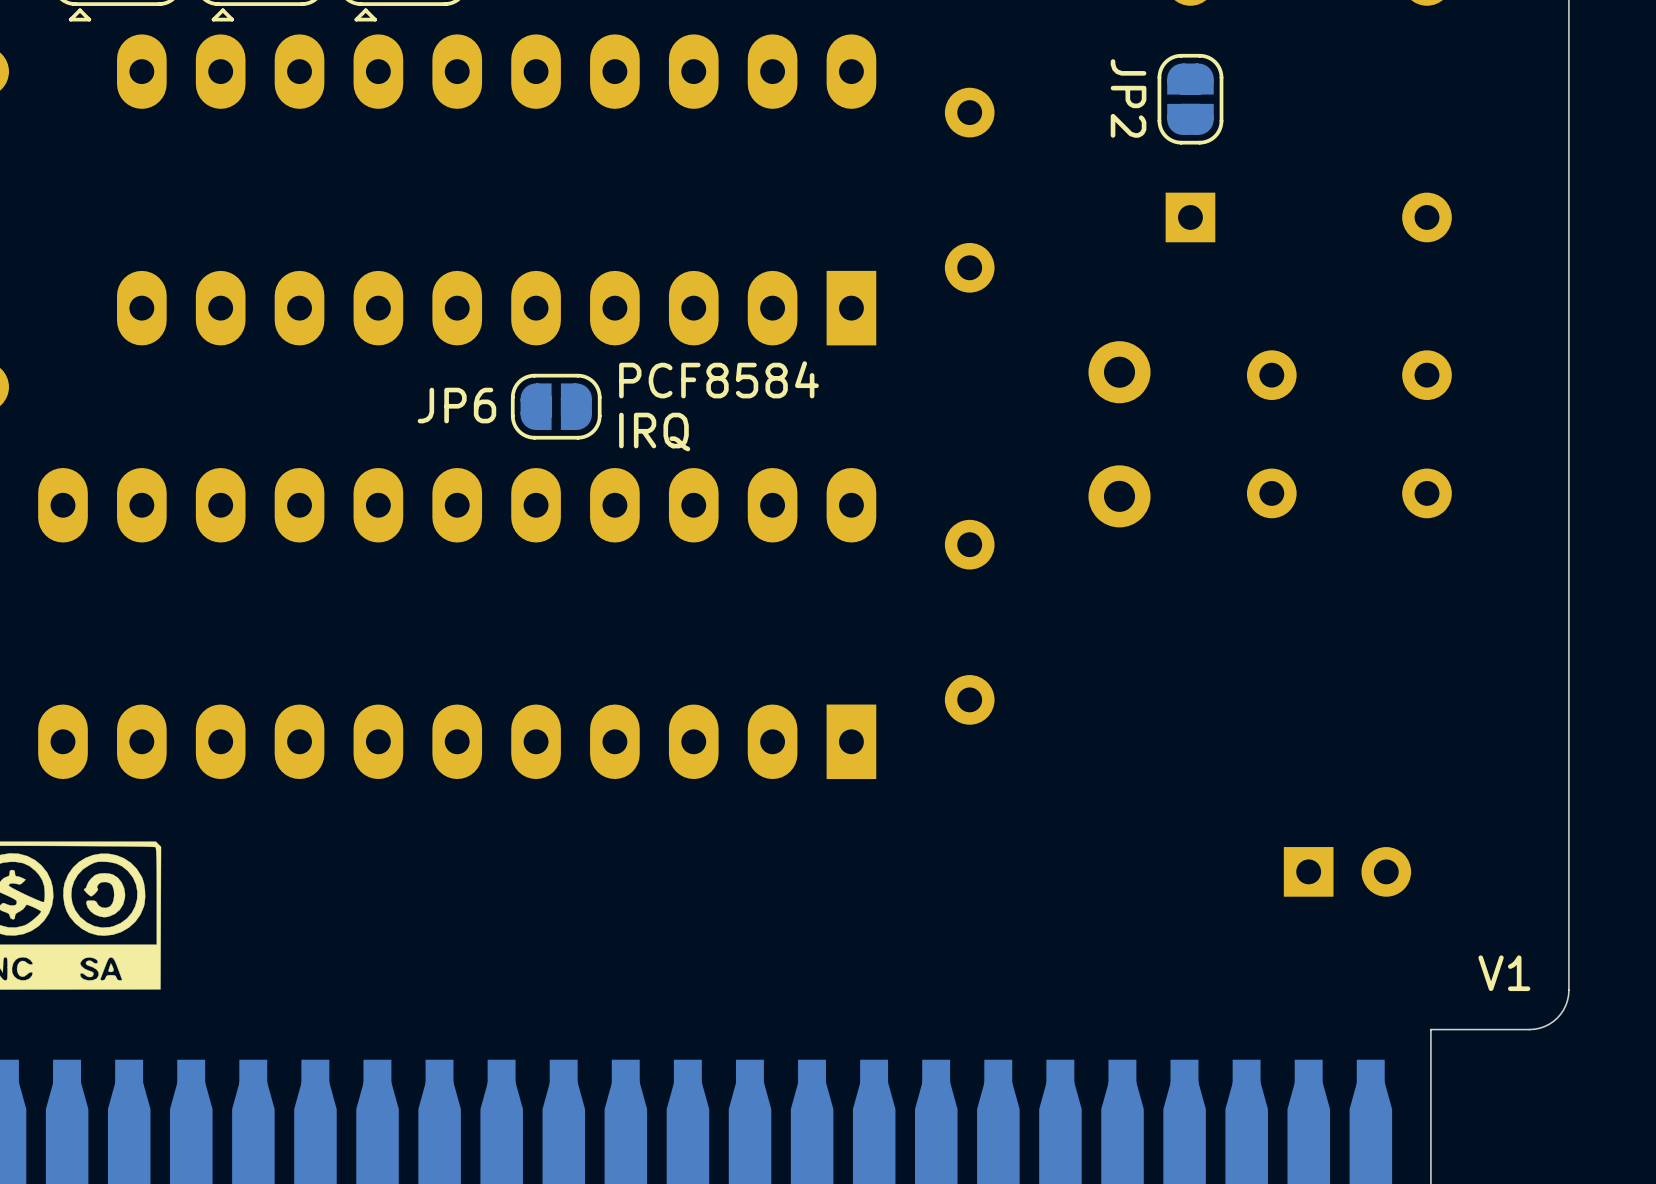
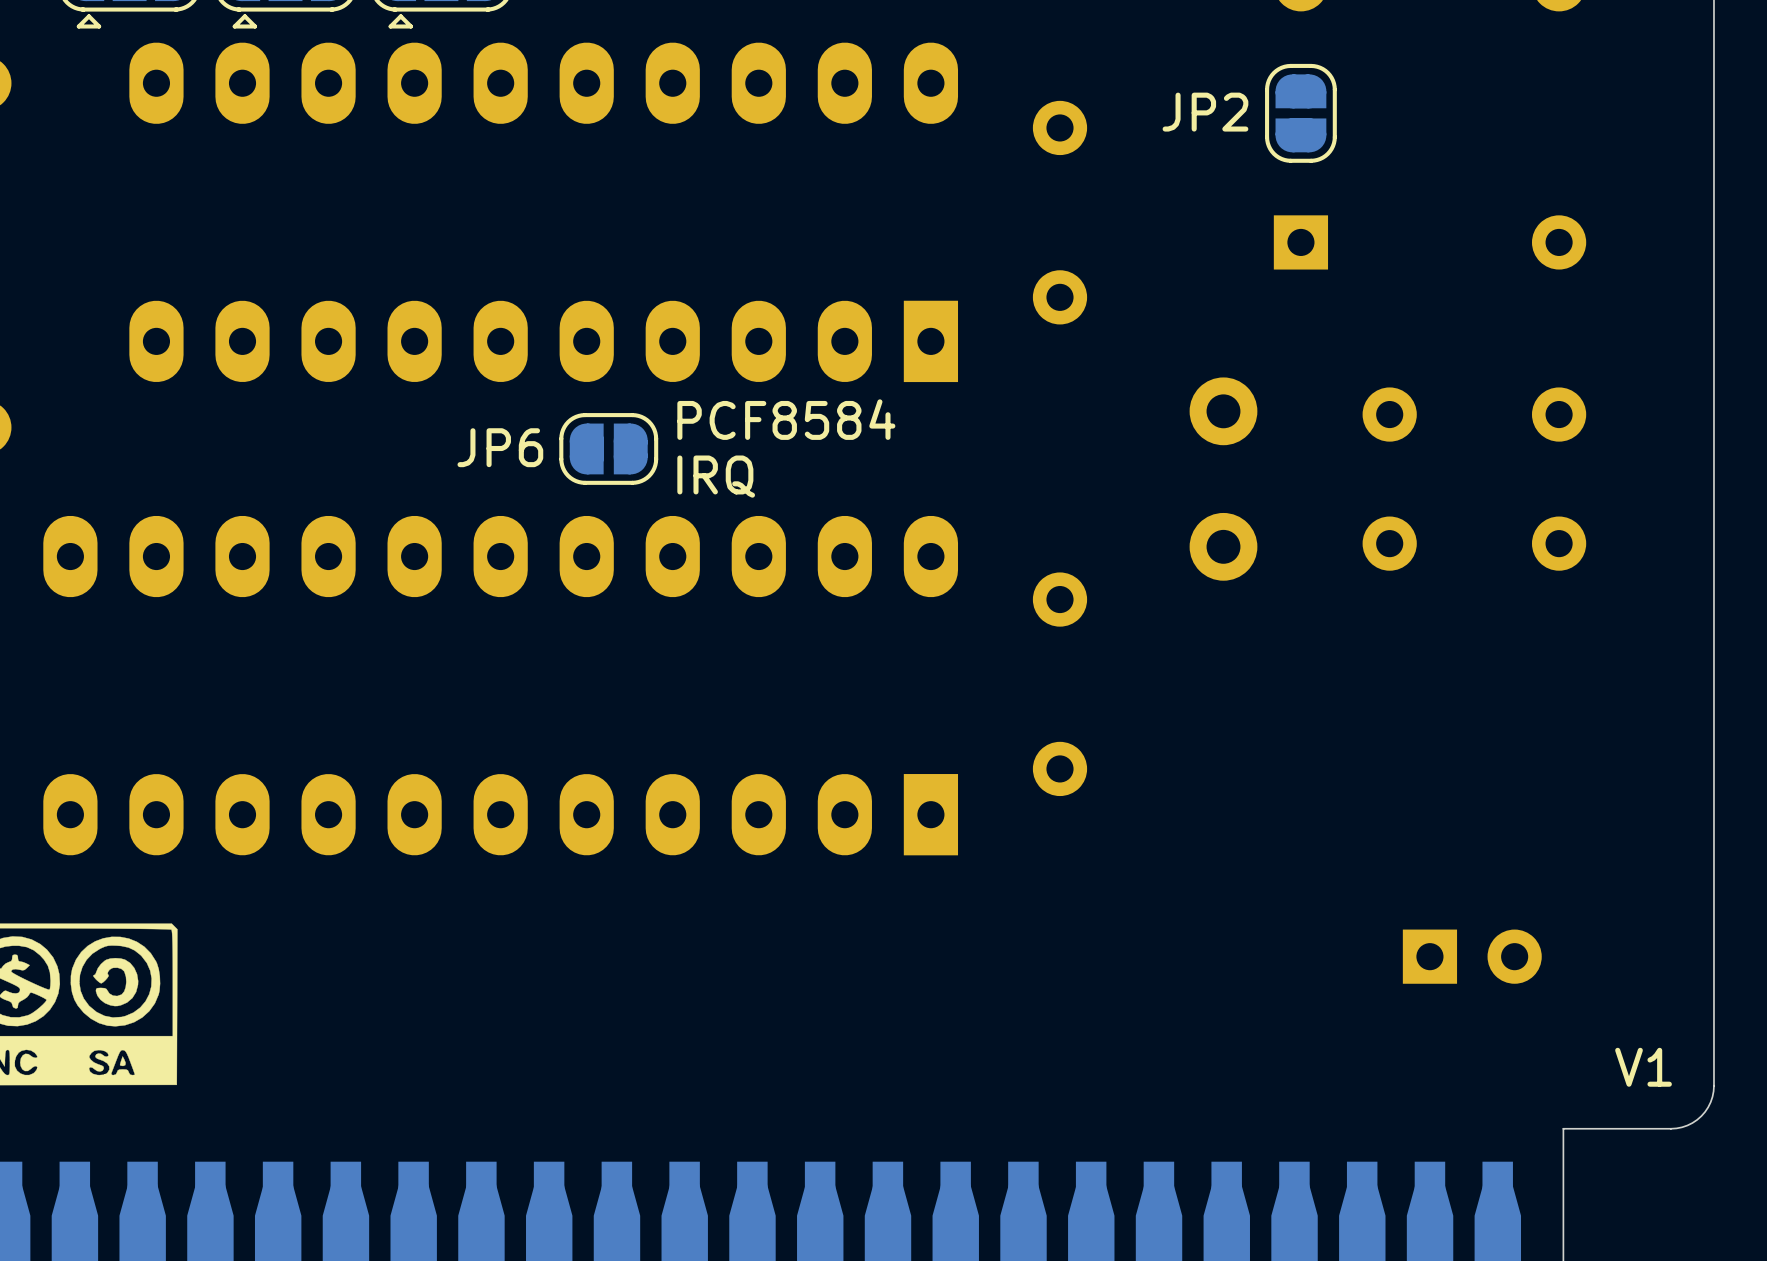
JP2 name rotation: 0° (1128, 98) -> 90° counterclockwise (1205, 112)

